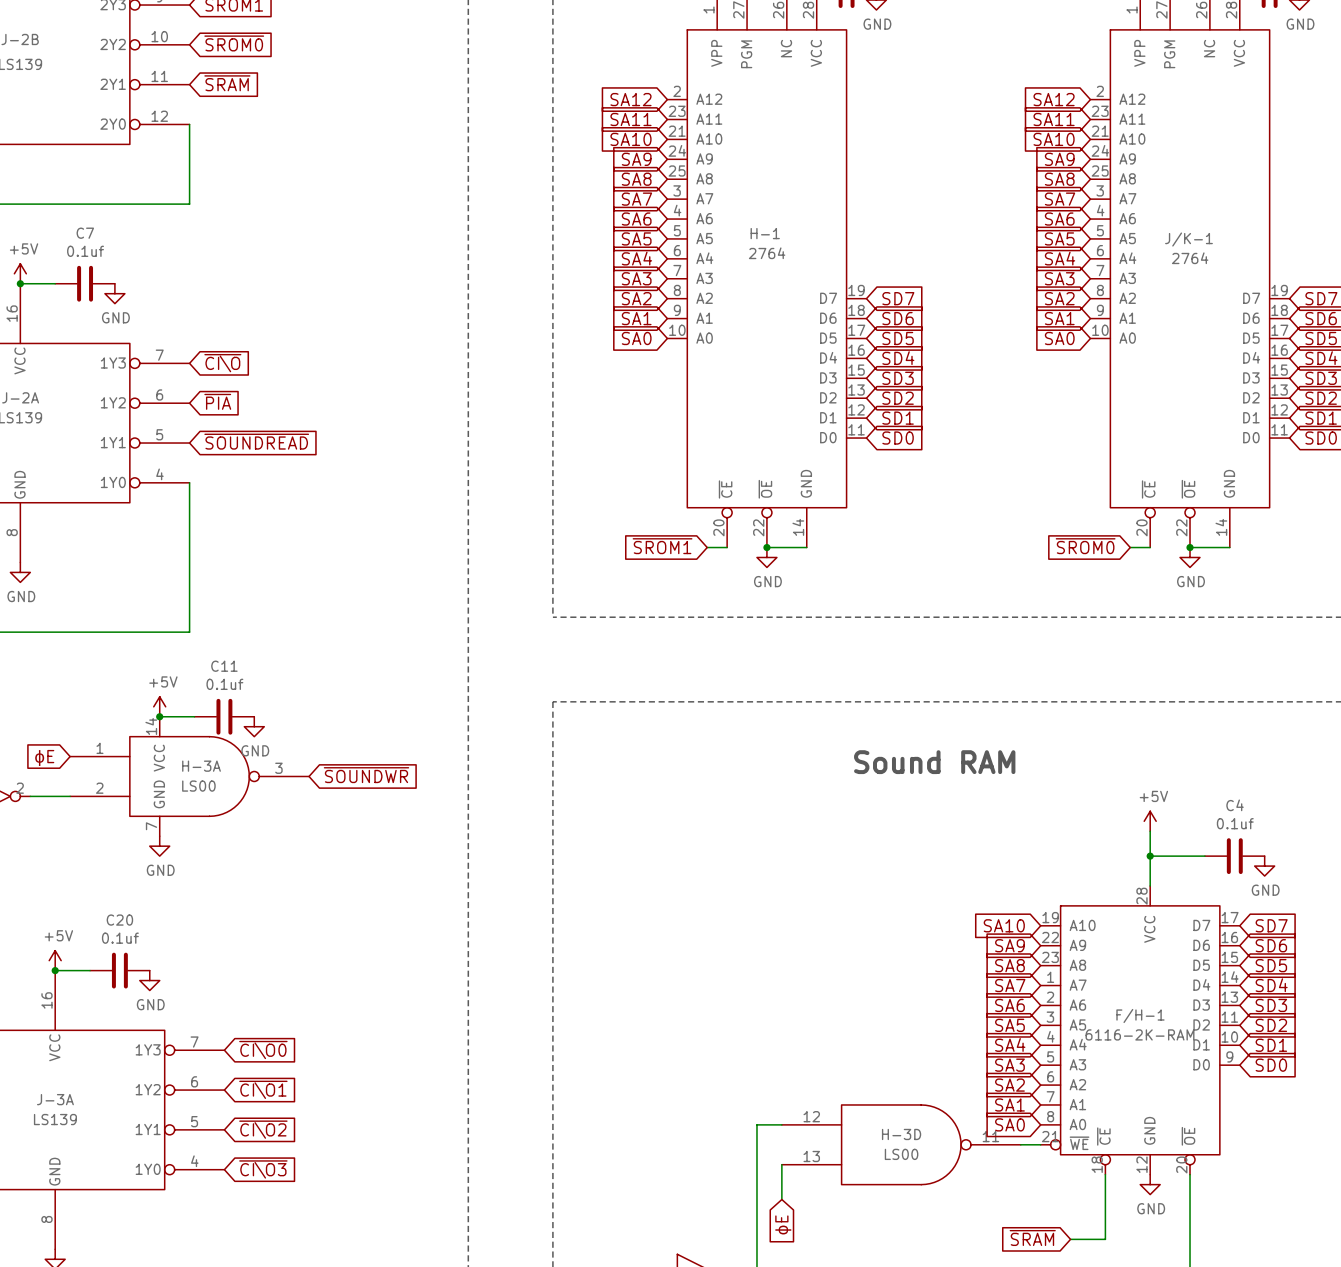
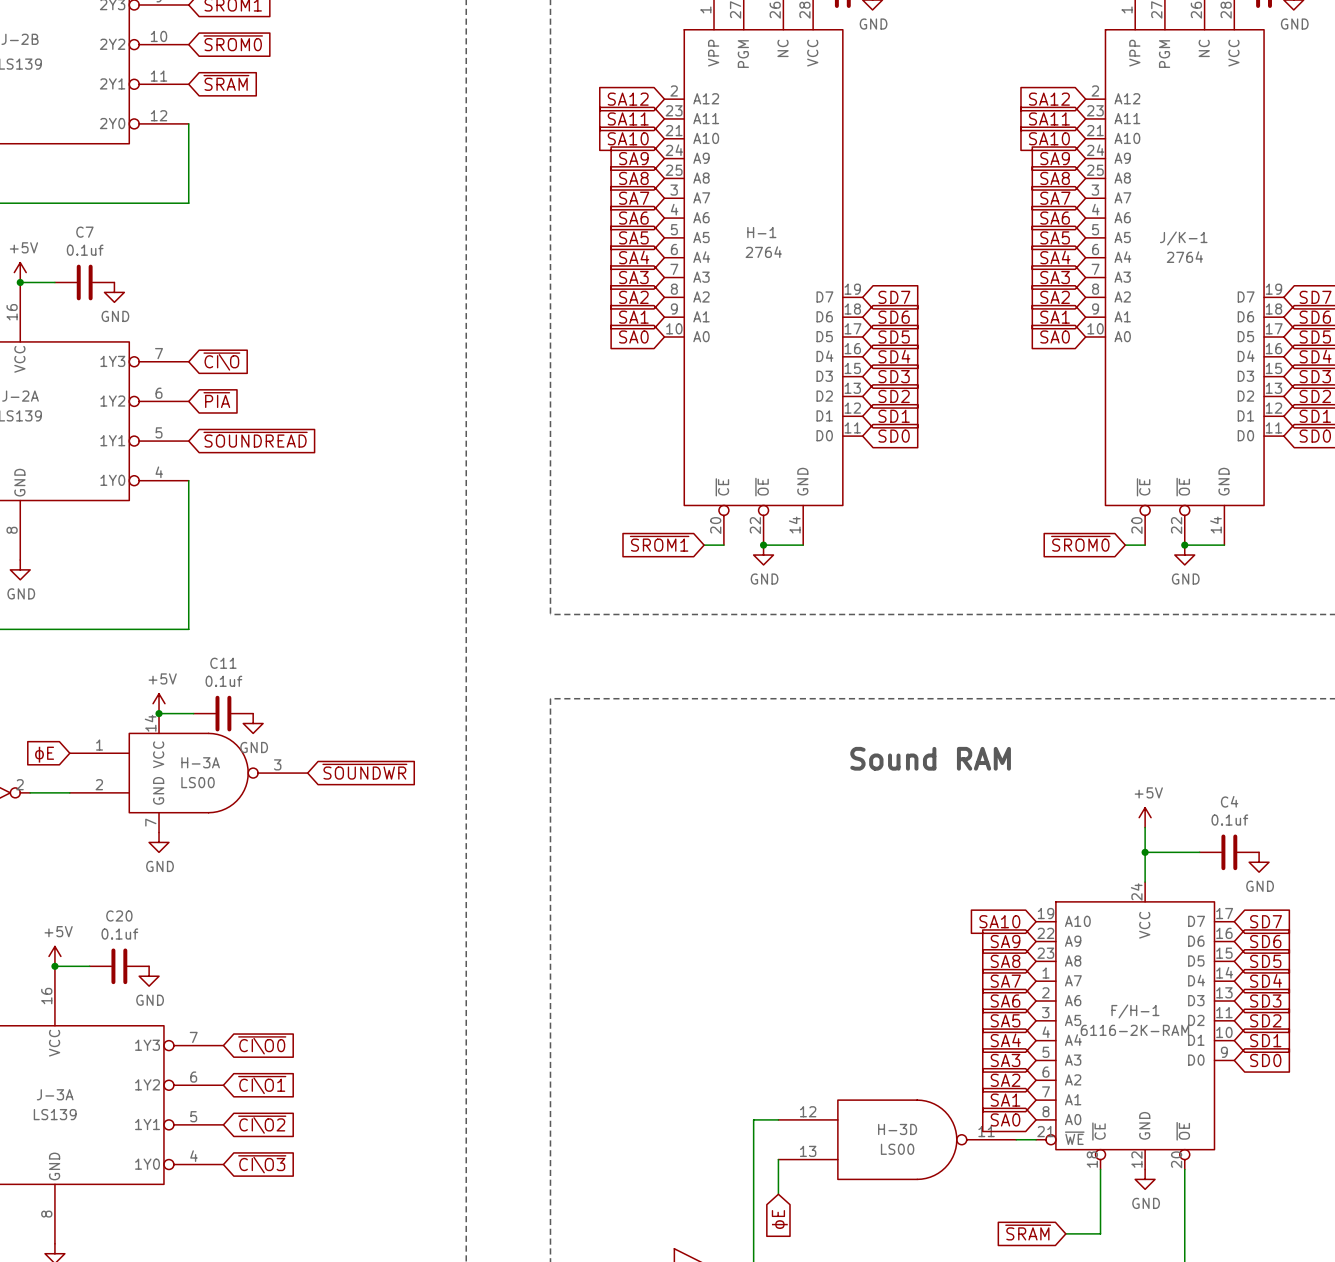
F/H-1 pin number: 28 (1141, 896) -> 24 (1136, 891)

